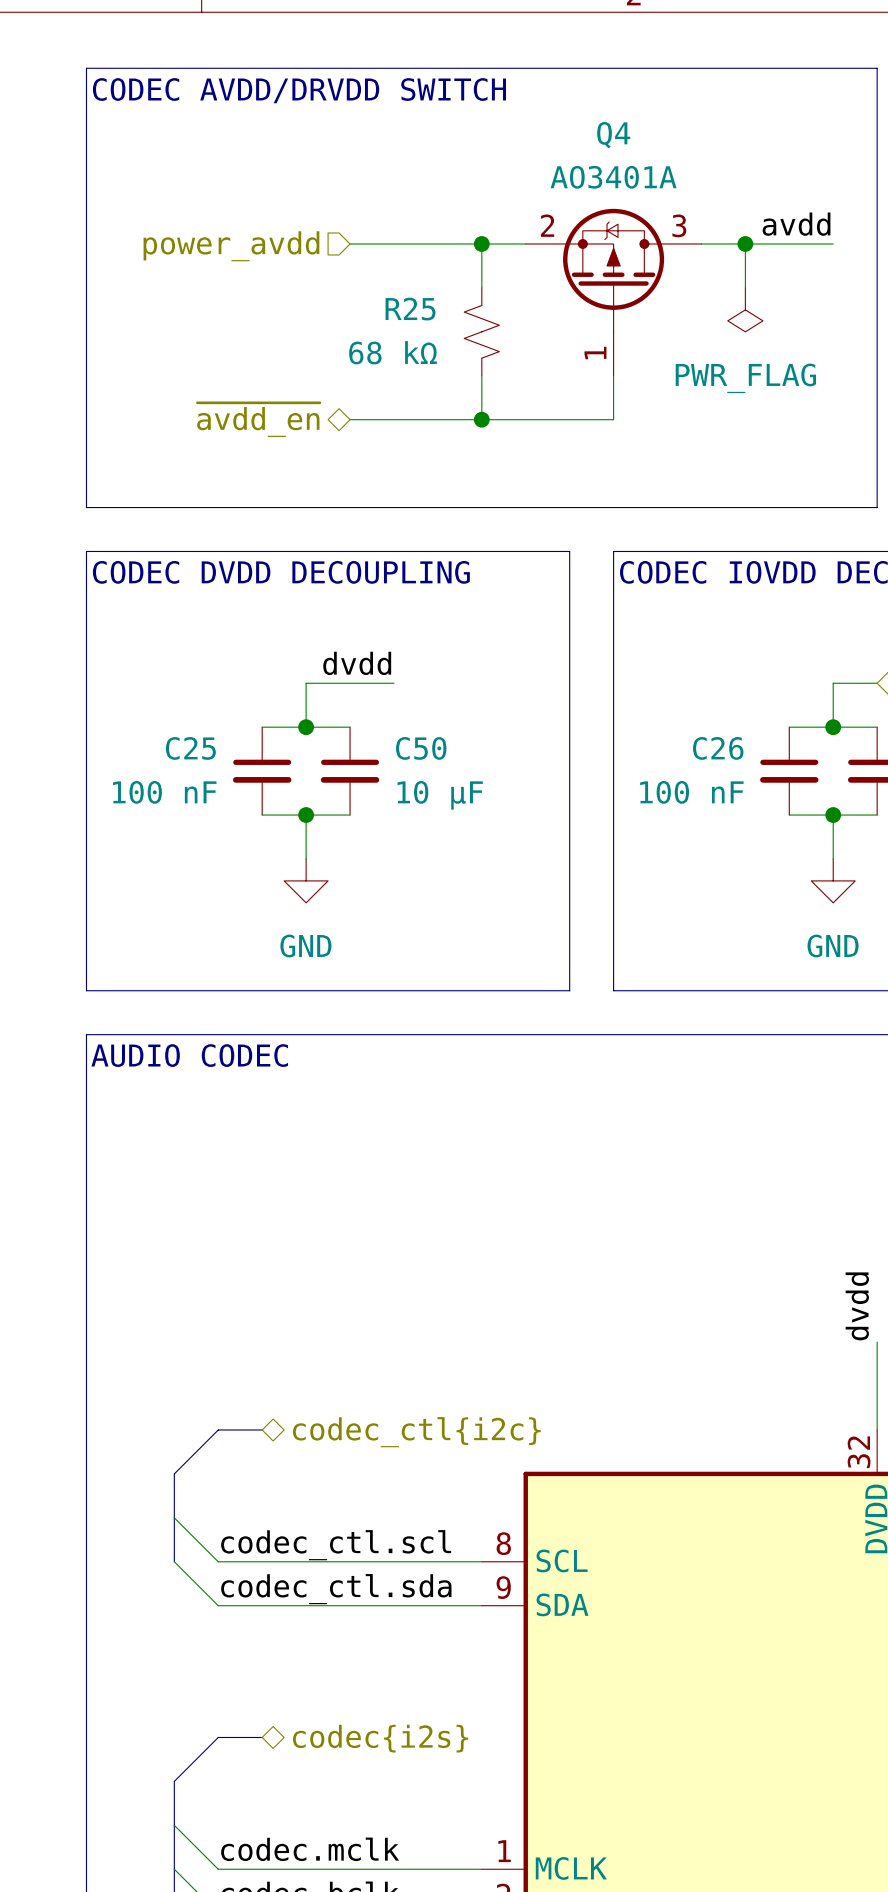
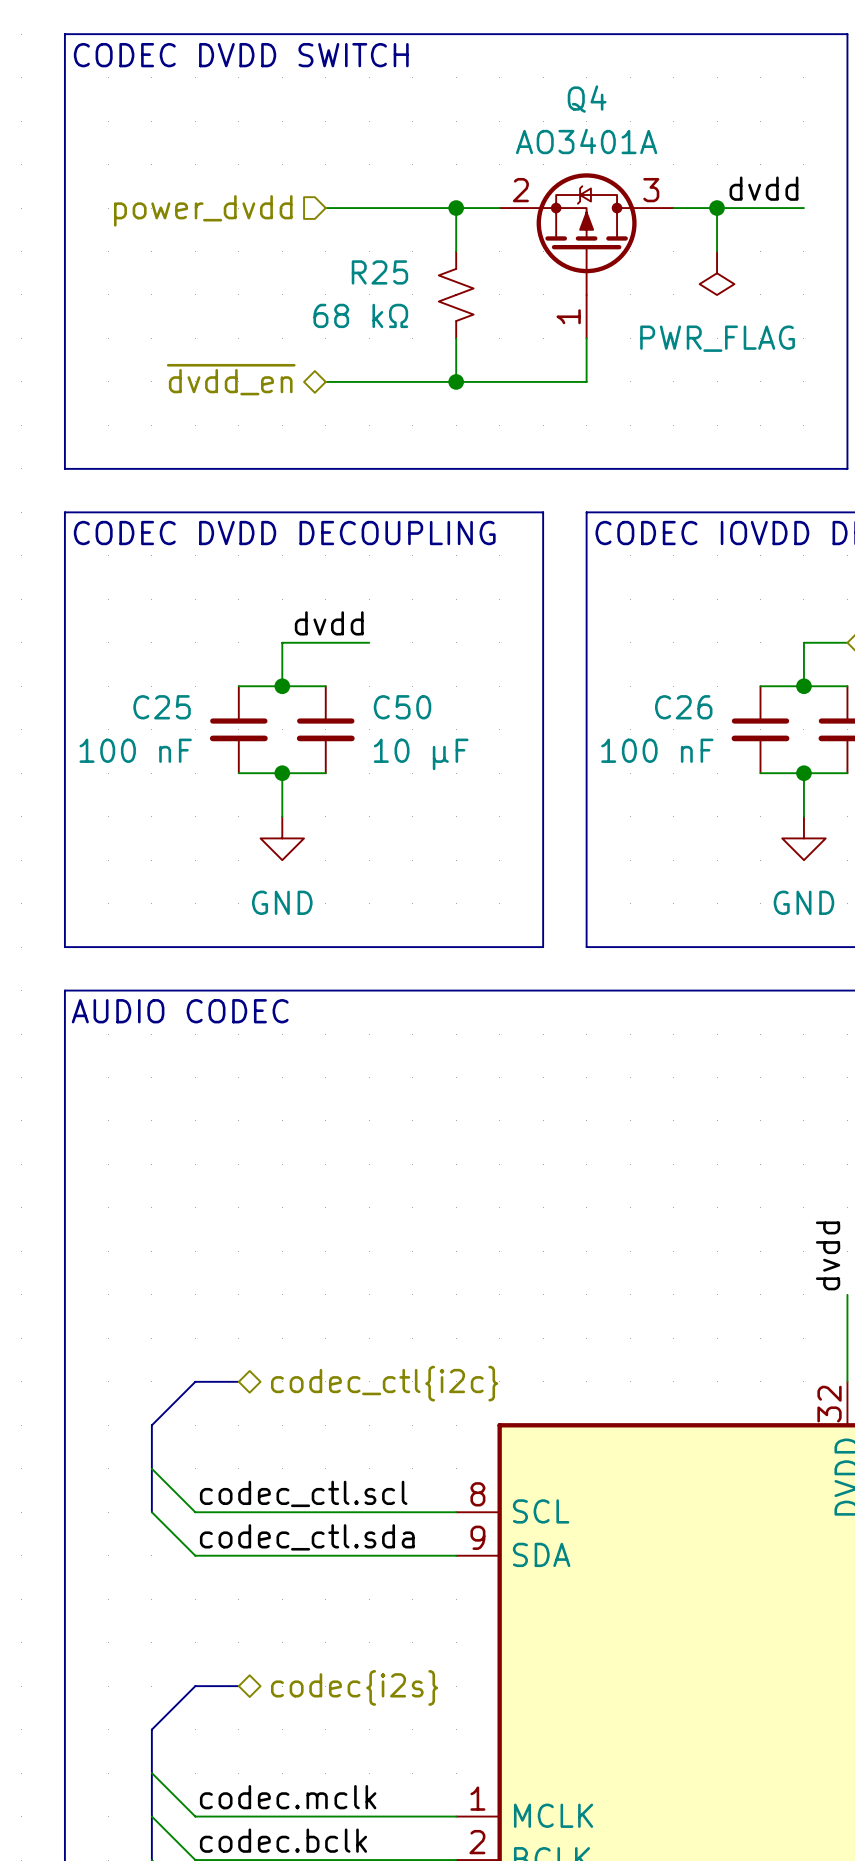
text: CODEC AVDD/DRVDD SWITCH (299, 90) -> CODEC DVDD SWITCH (241, 55)
label: avdd (796, 224) -> dvdd (763, 188)
hierarchical label: power_avdd (231, 246) -> power_dvdd (203, 210)
hierarchical label: ~{avdd_en} (258, 419) -> ~{dvdd_en} (231, 379)

